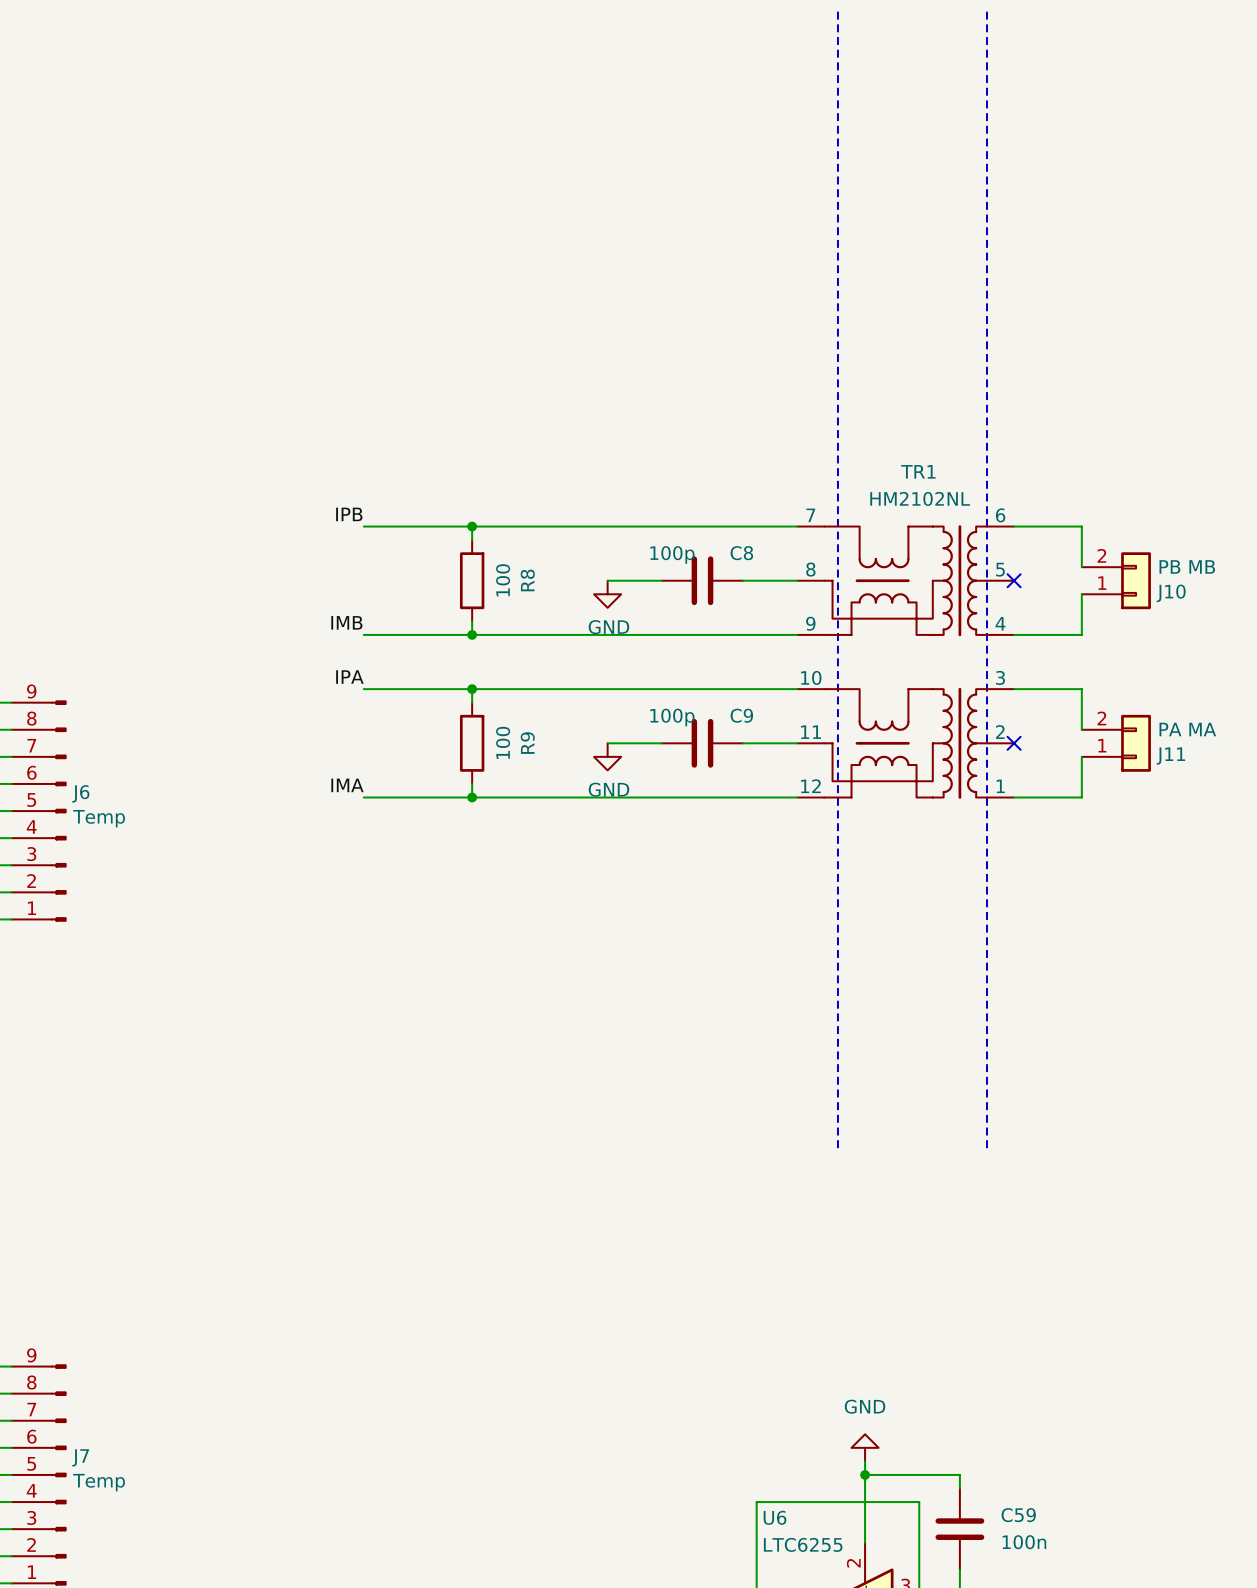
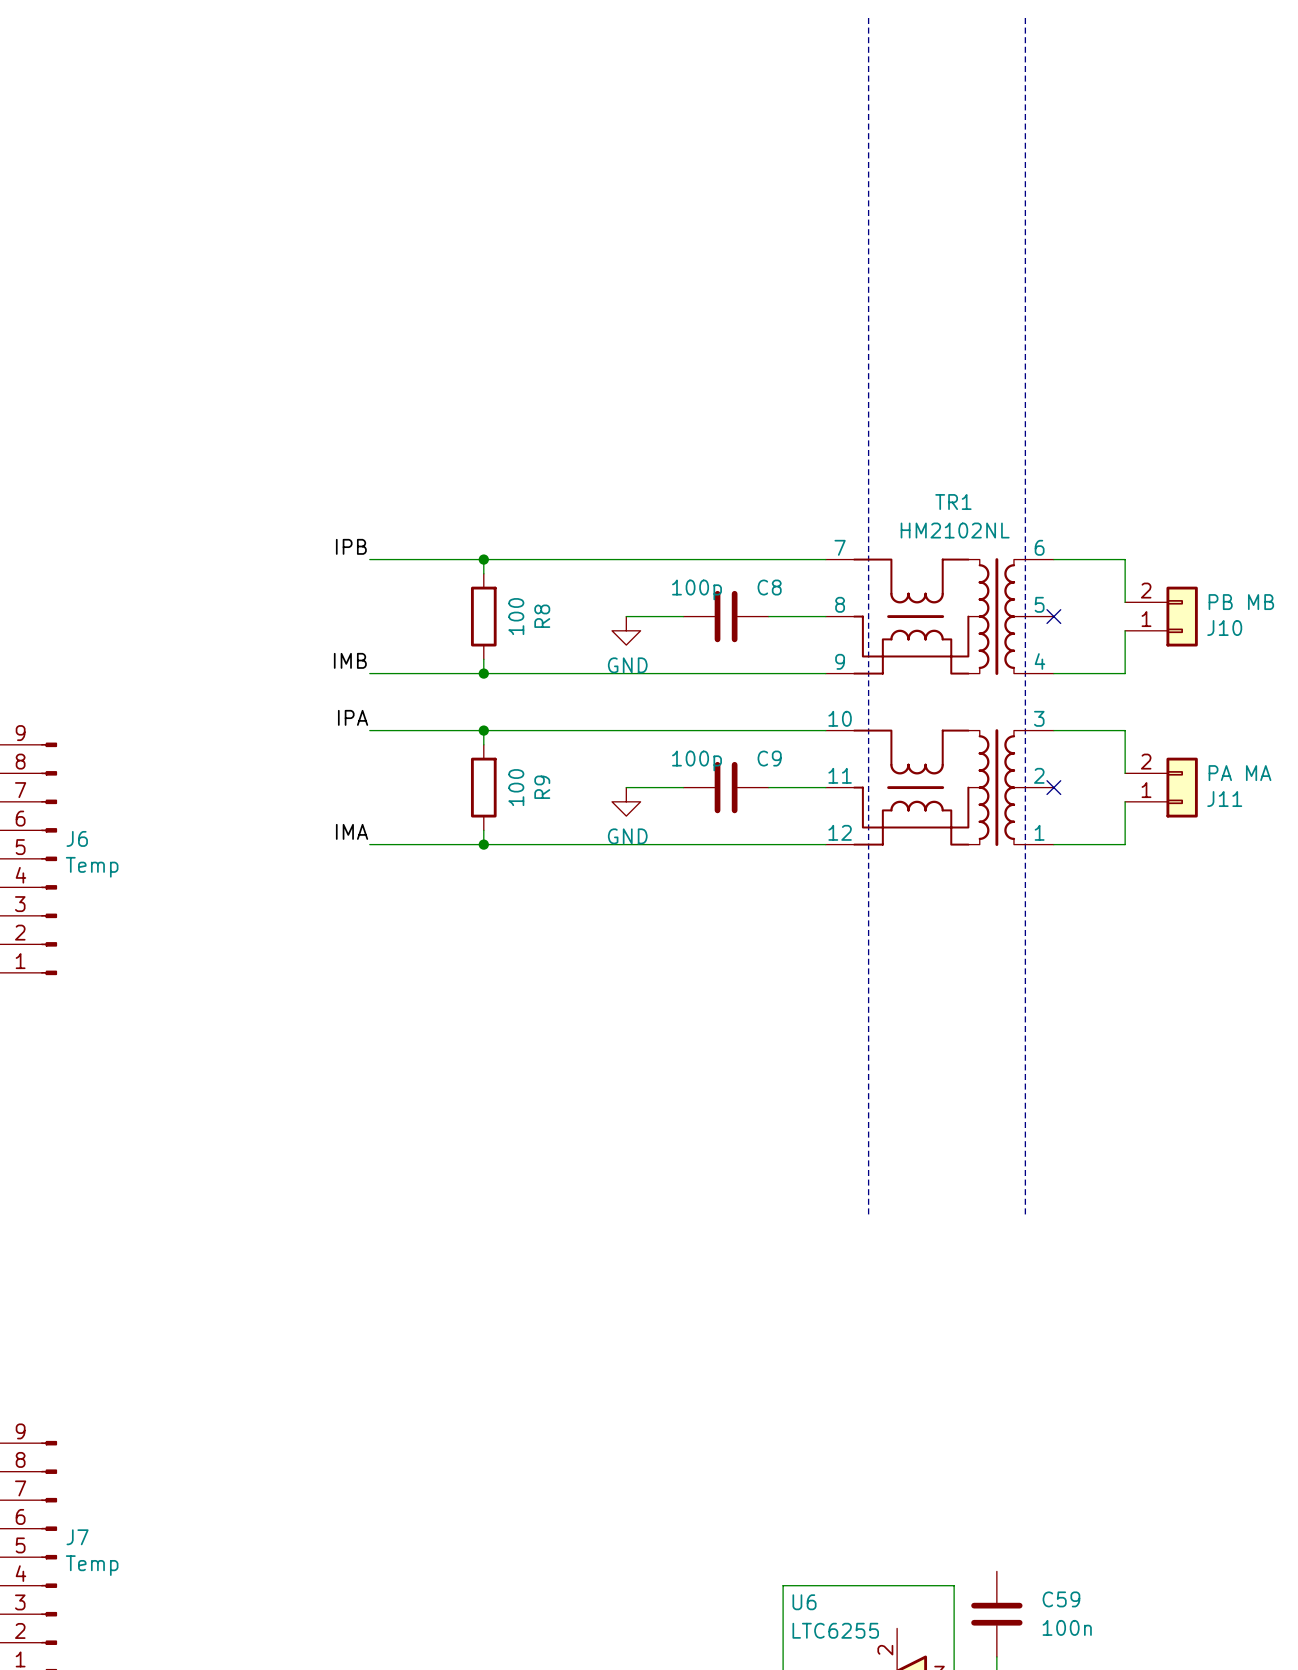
power symbol: GND (865, 1447) -> none
wire: (865, 1461) (865, 1542) -> none
wire: (865, 1474) (959, 1474) (959, 1488) -> none
junction: (865, 1474) -> none

